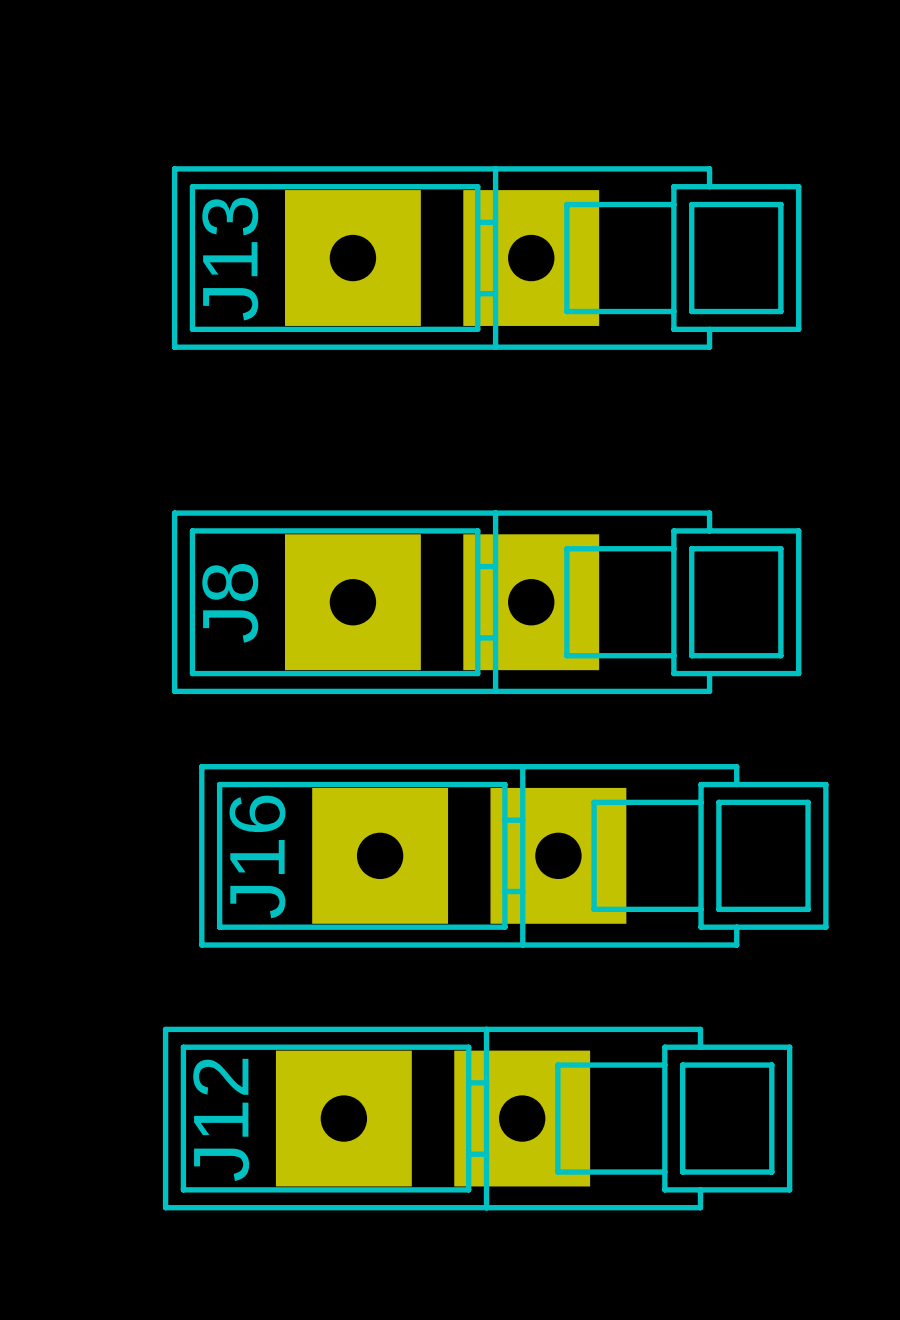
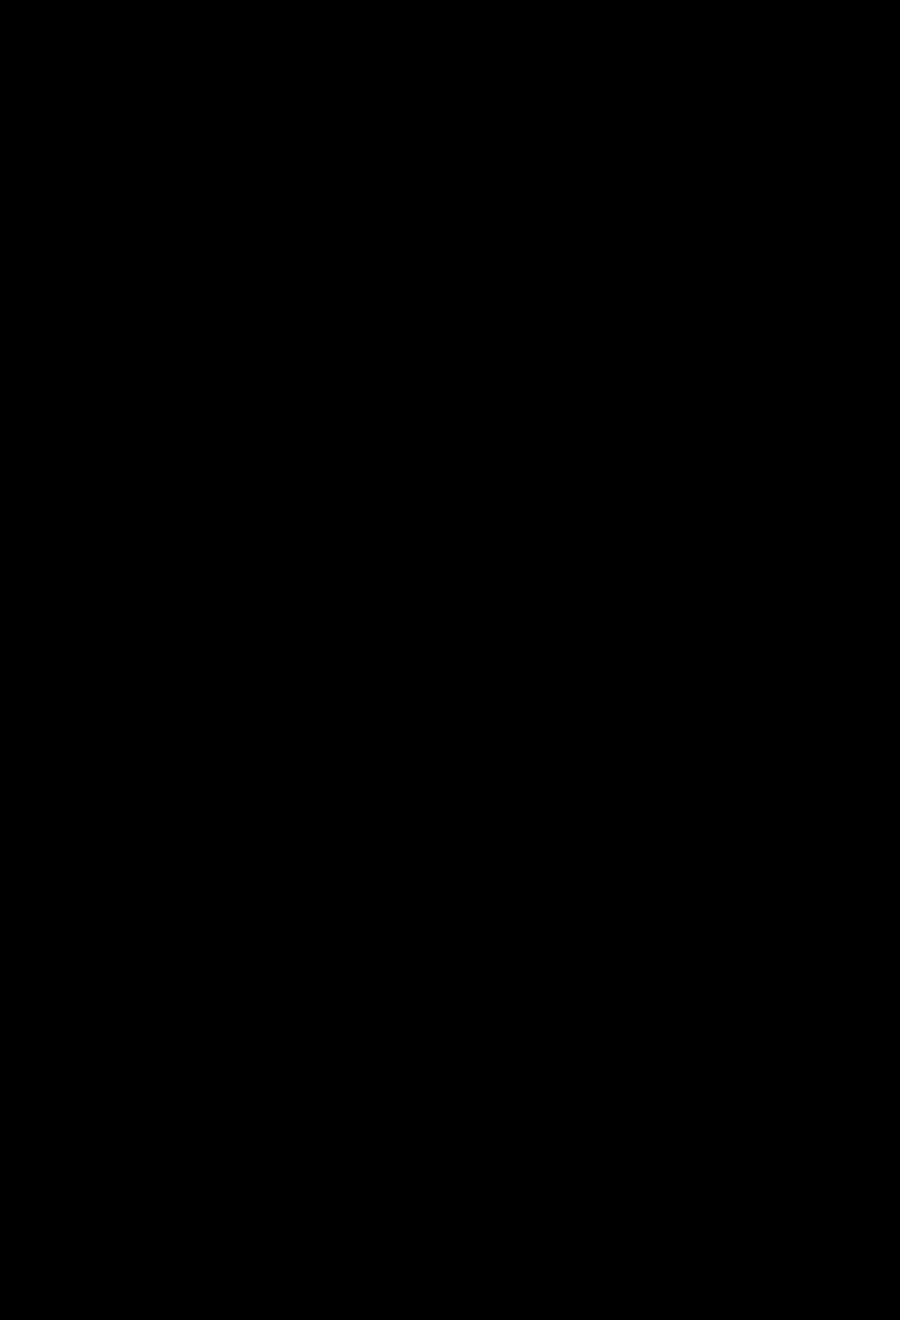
J13: (486, 258) -> none
J8: (486, 602) -> none
J16: (513, 855) -> none
J12: (477, 1118) -> none

